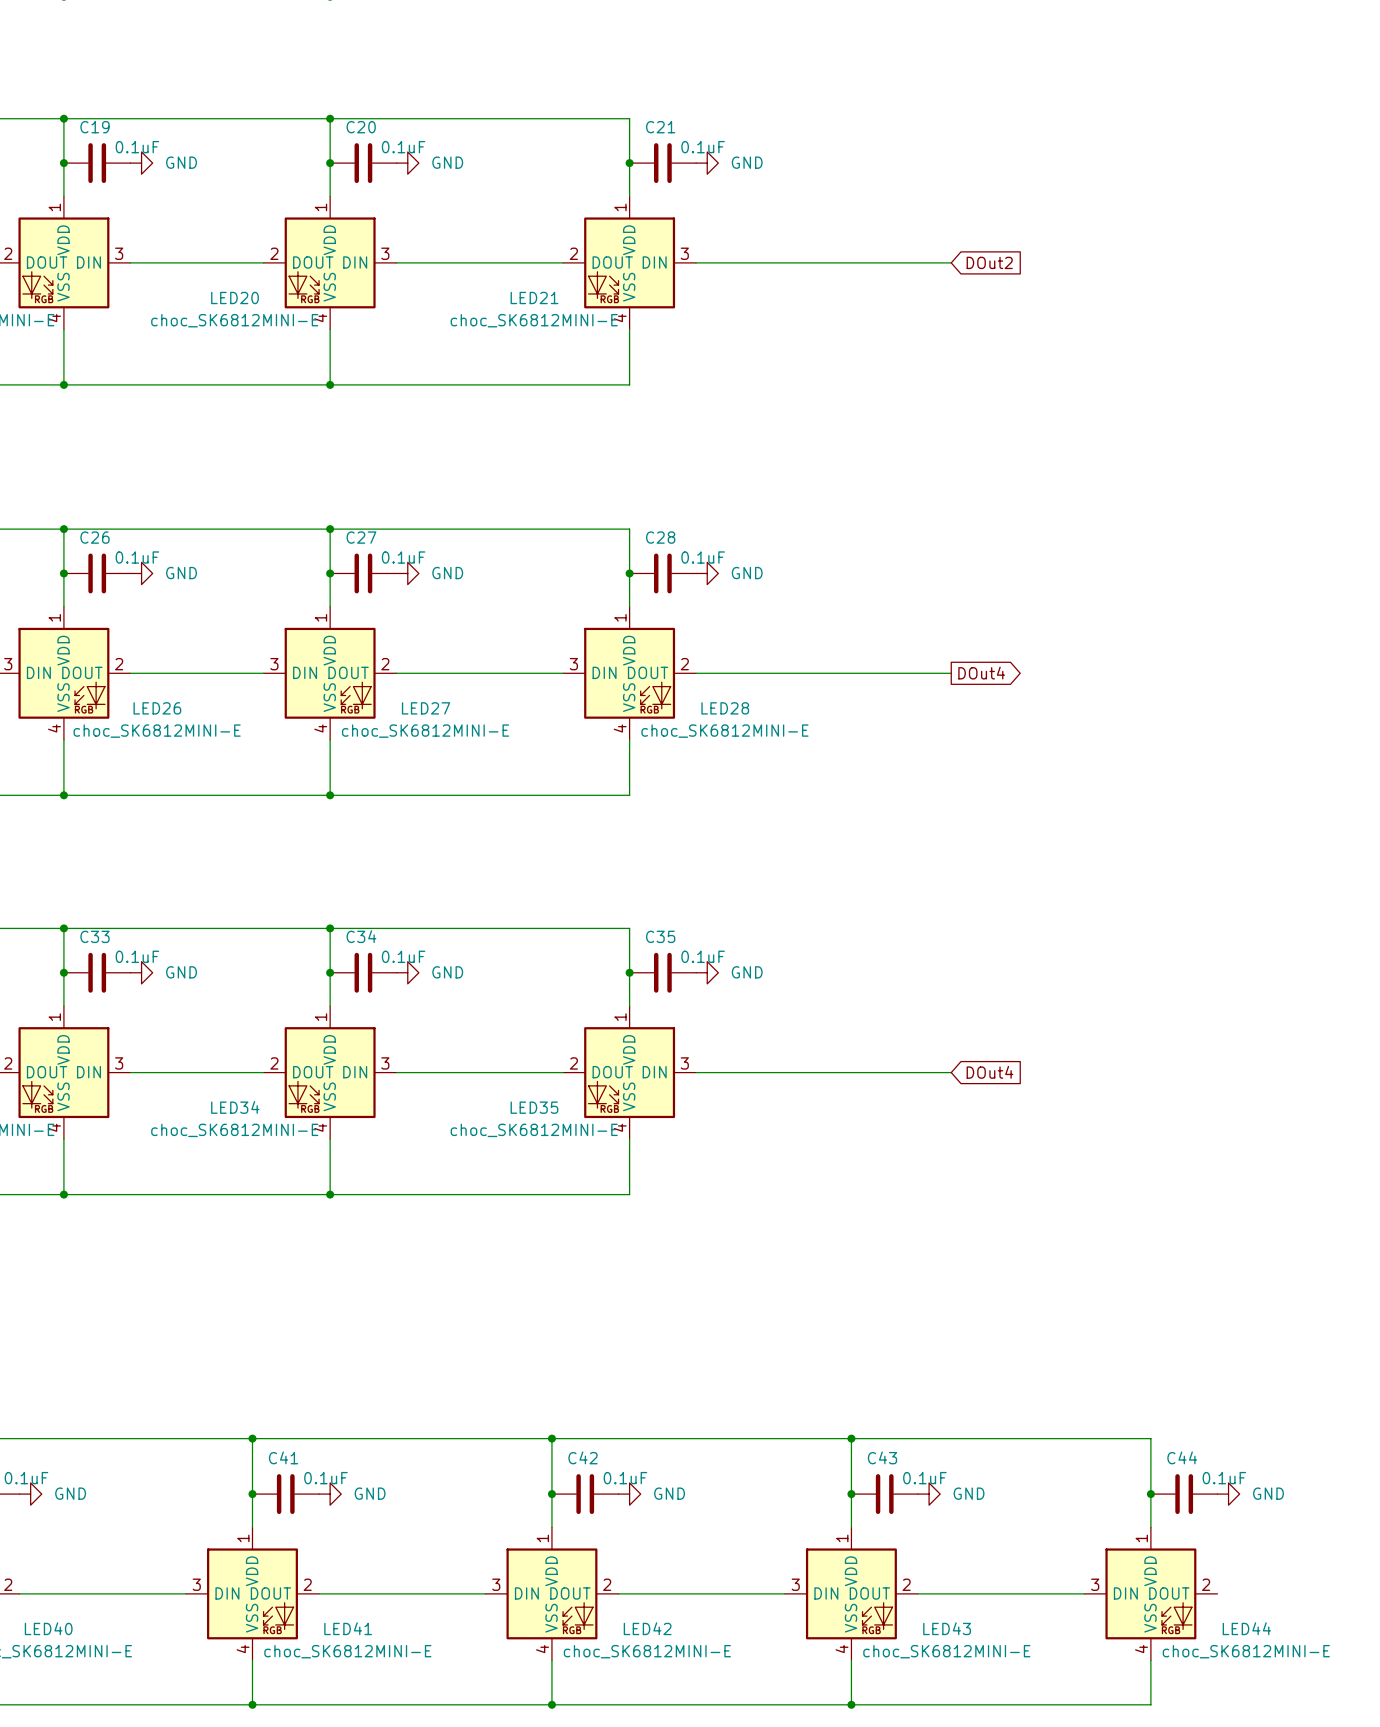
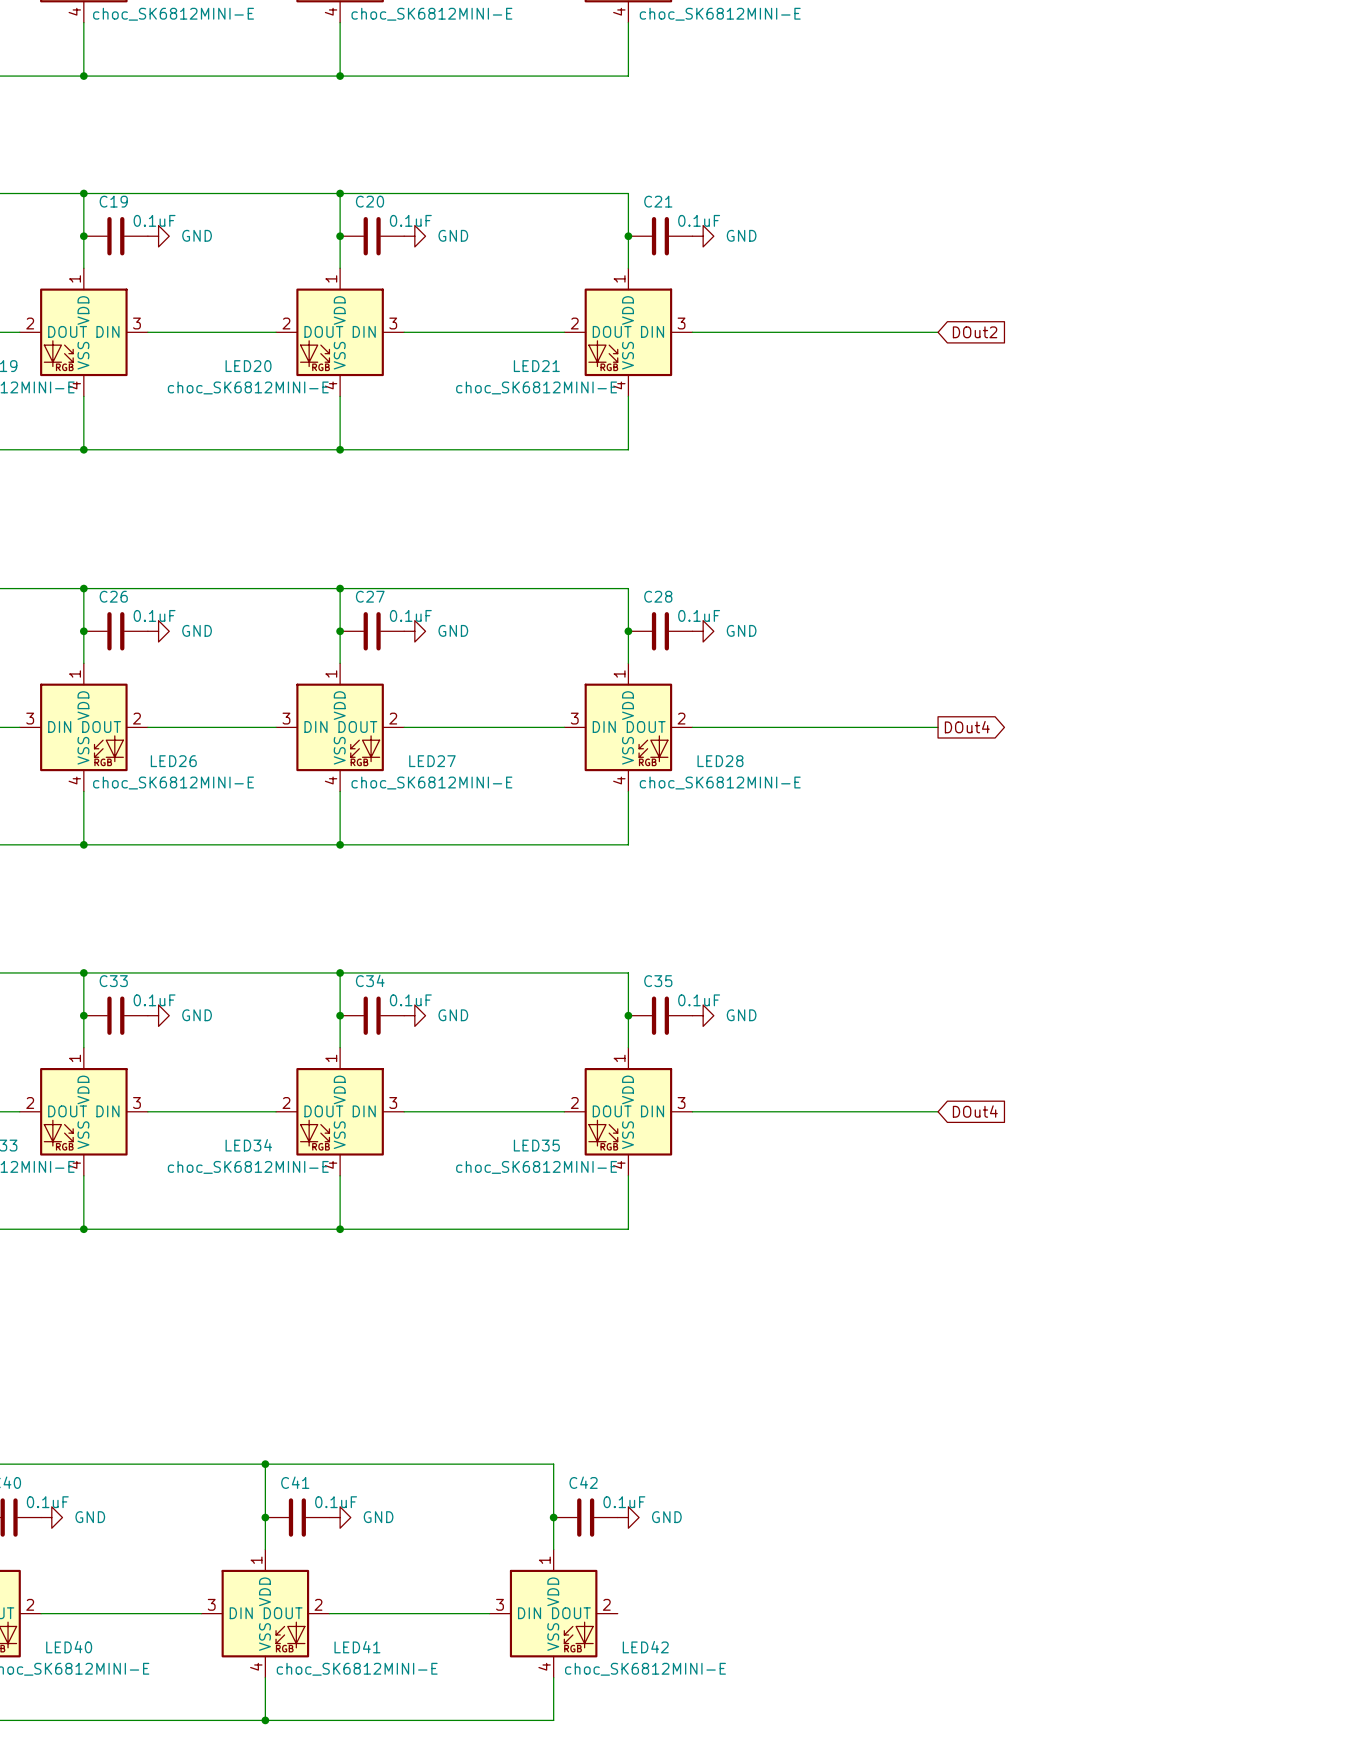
wire: (551, 1438) (1150, 1438) (1150, 1527) -> none
junction: (551, 1438) -> none
wire: (851, 1438) (851, 1527) -> none
junction: (851, 1438) -> none
junction: (851, 1494) -> none
C43: 0.1uF (884, 1494) -> none
power symbol: GND (929, 1494) -> none
junction: (1150, 1494) -> none
C44: 0.1uF (1184, 1494) -> none
power symbol: GND (1228, 1494) -> none
wire: (618, 1593) (784, 1593) -> none
LED43: choc_SK6812MINI-E (851, 1593) -> none
wire: (917, 1593) (1084, 1593) -> none
LED44: choc_SK6812MINI-E (1150, 1593) -> none
wire: (851, 1660) (851, 1704) -> none
wire: (1150, 1660) (1150, 1704) (551, 1704) -> none
junction: (551, 1704) -> none
junction: (851, 1704) -> none

